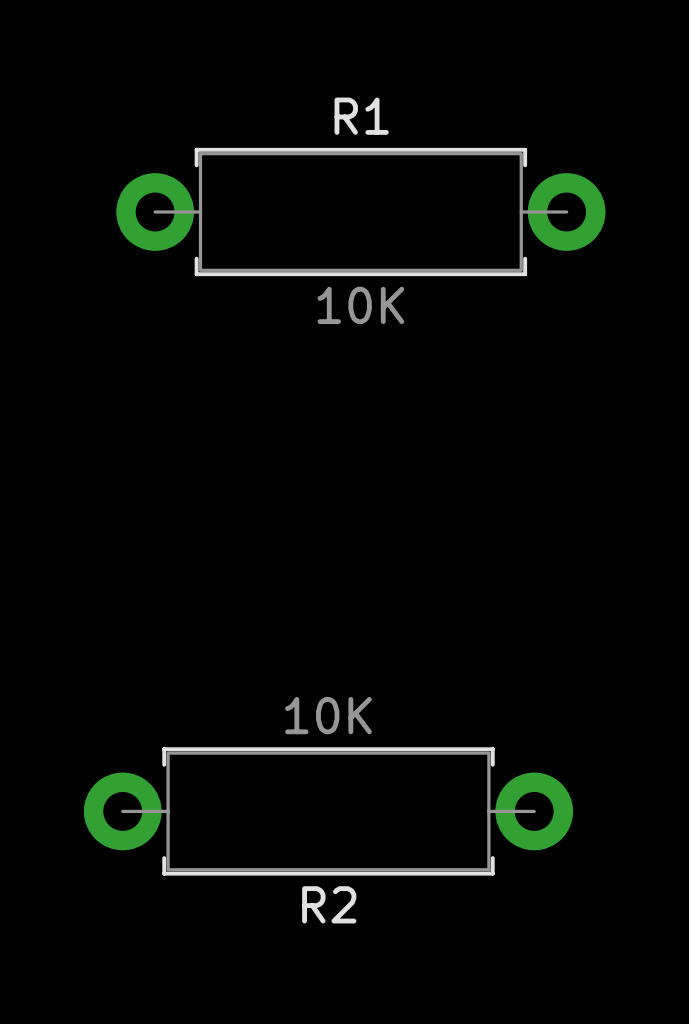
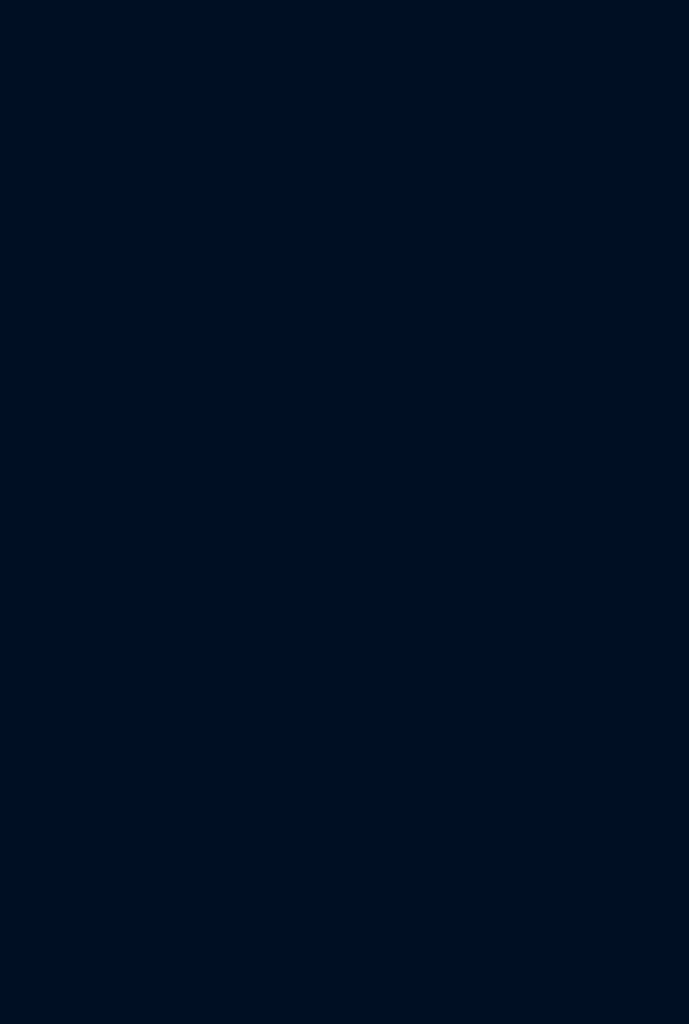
R1: 10K (360, 212) -> none
R2: 10K (328, 811) -> none

